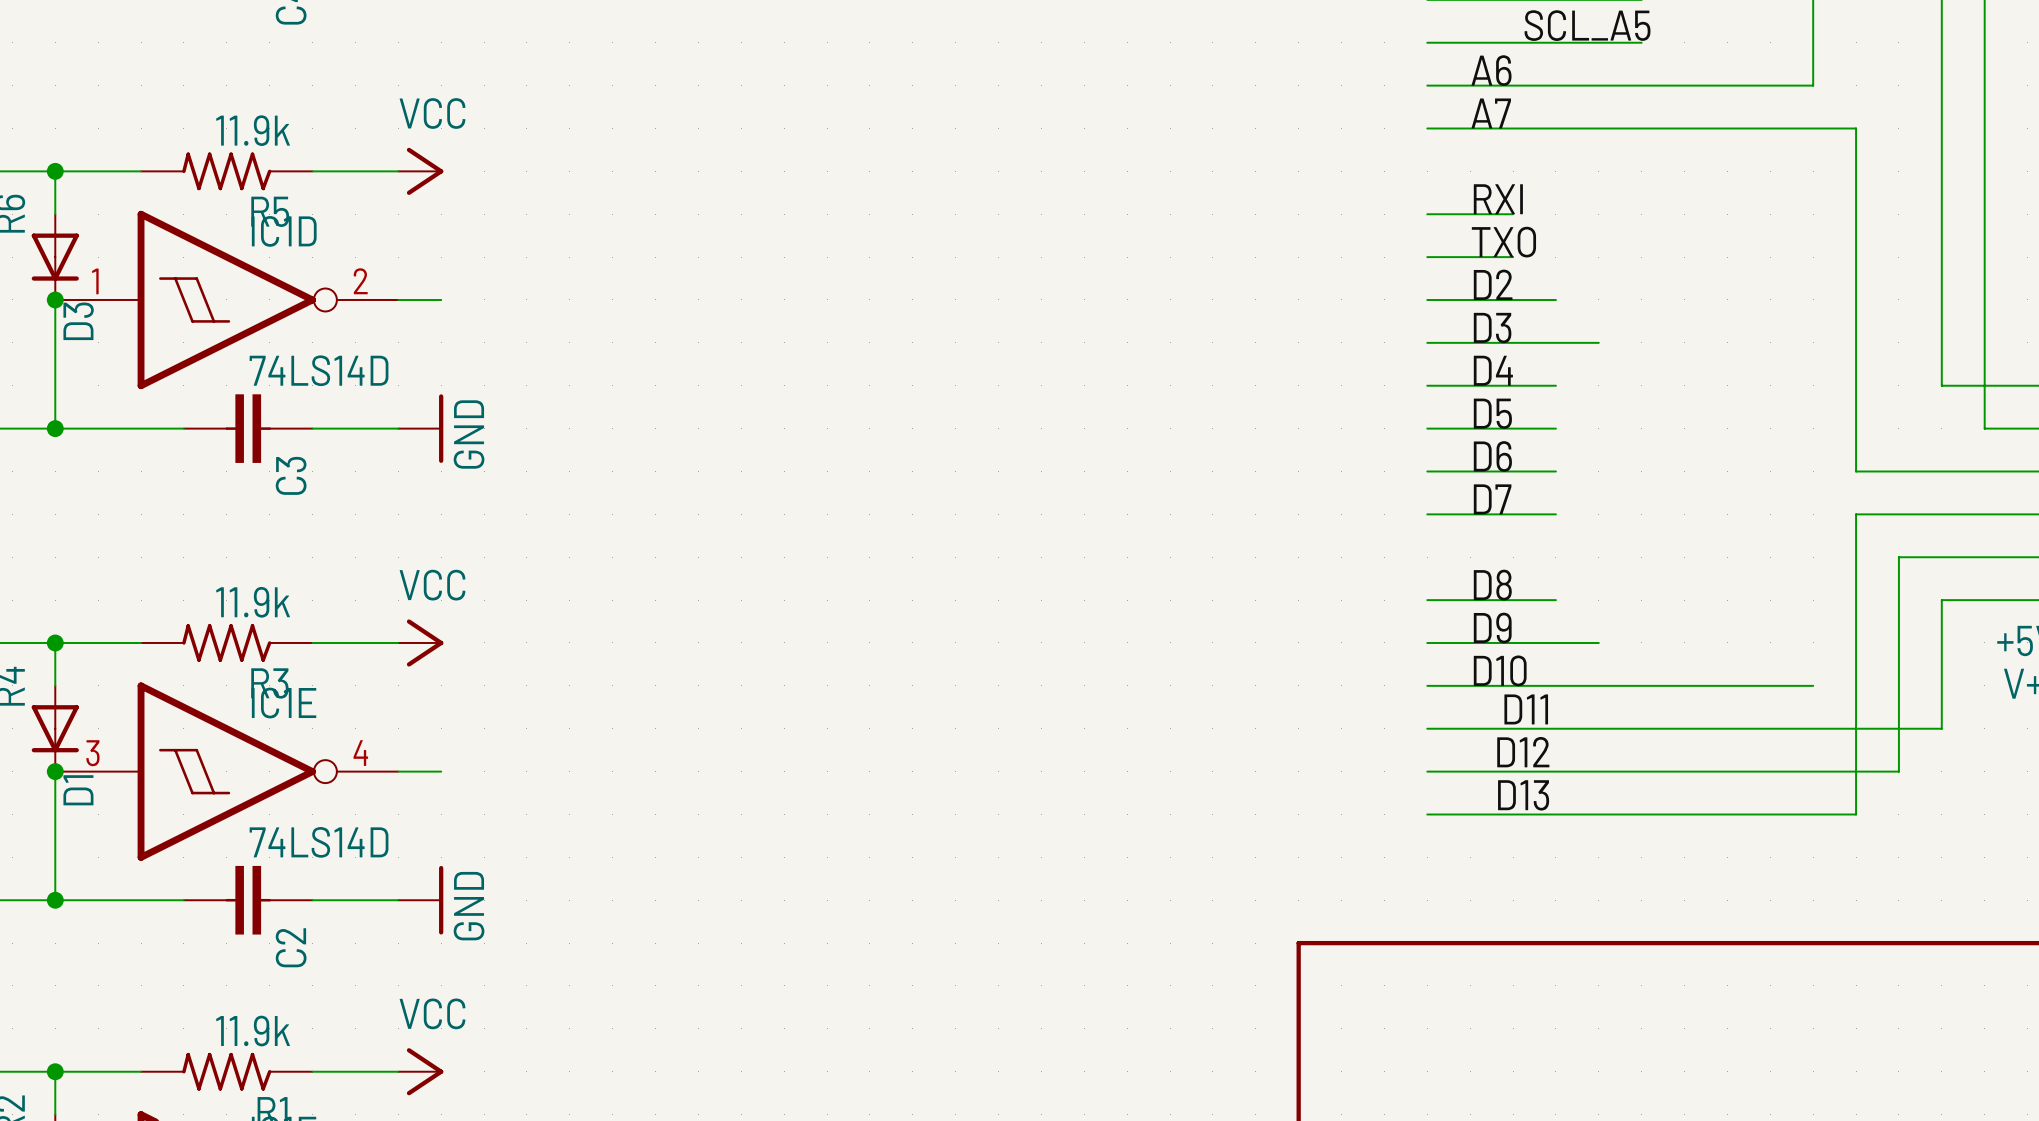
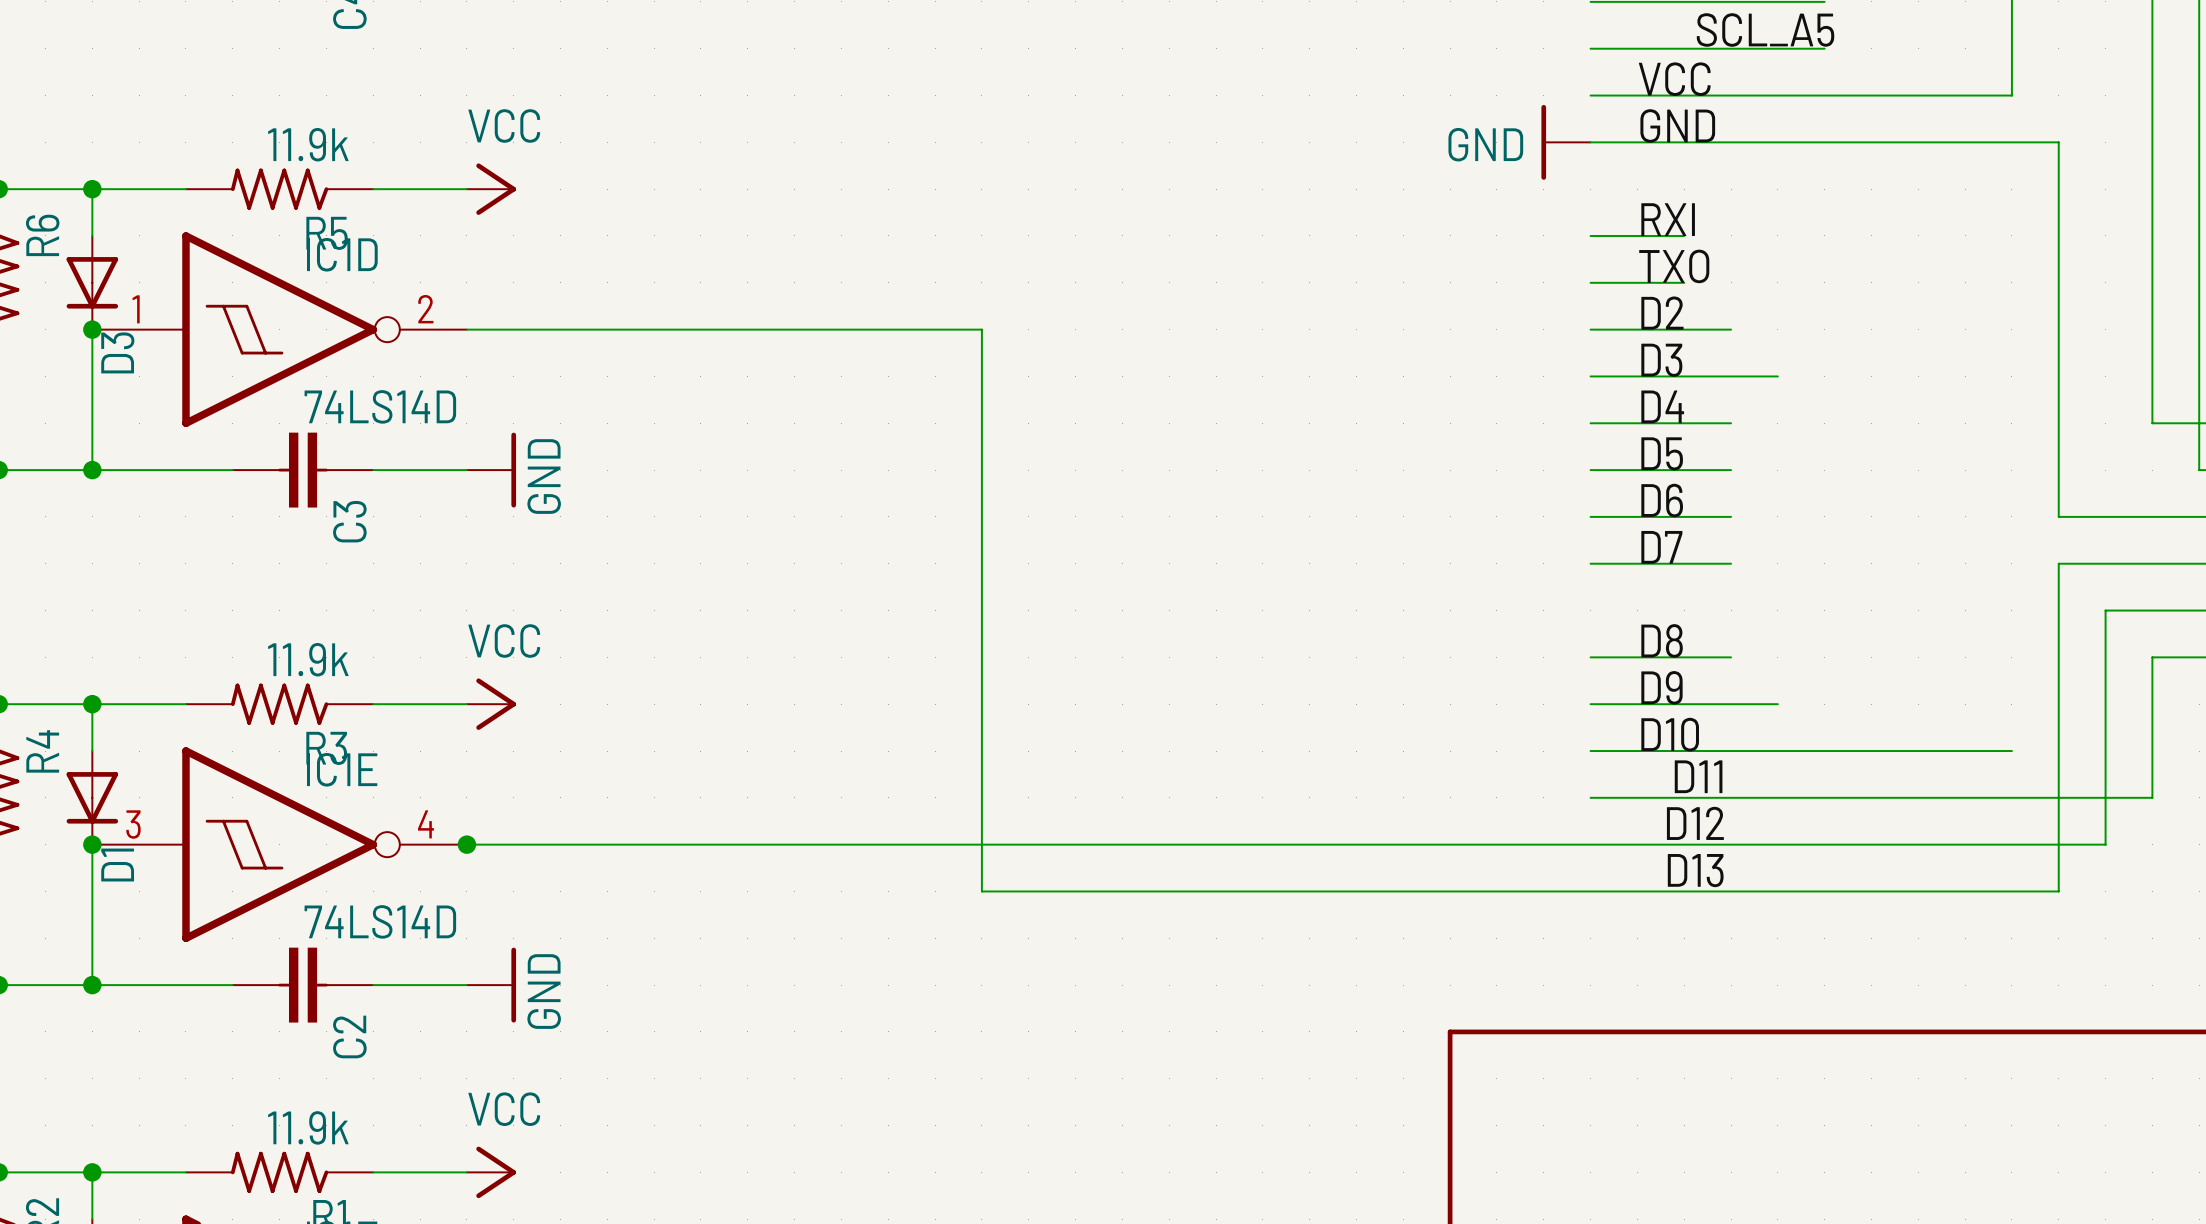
label: A6 (1491, 70) -> VCC (1674, 79)
label: A7 (1491, 113) -> GND (1677, 125)
power symbol: none -> GND (1565, 142)
wire: none -> (513, 329) (981, 329) (981, 891) (1590, 891)
junction: none -> (466, 844)
wire: none -> (513, 844) (1590, 844)

